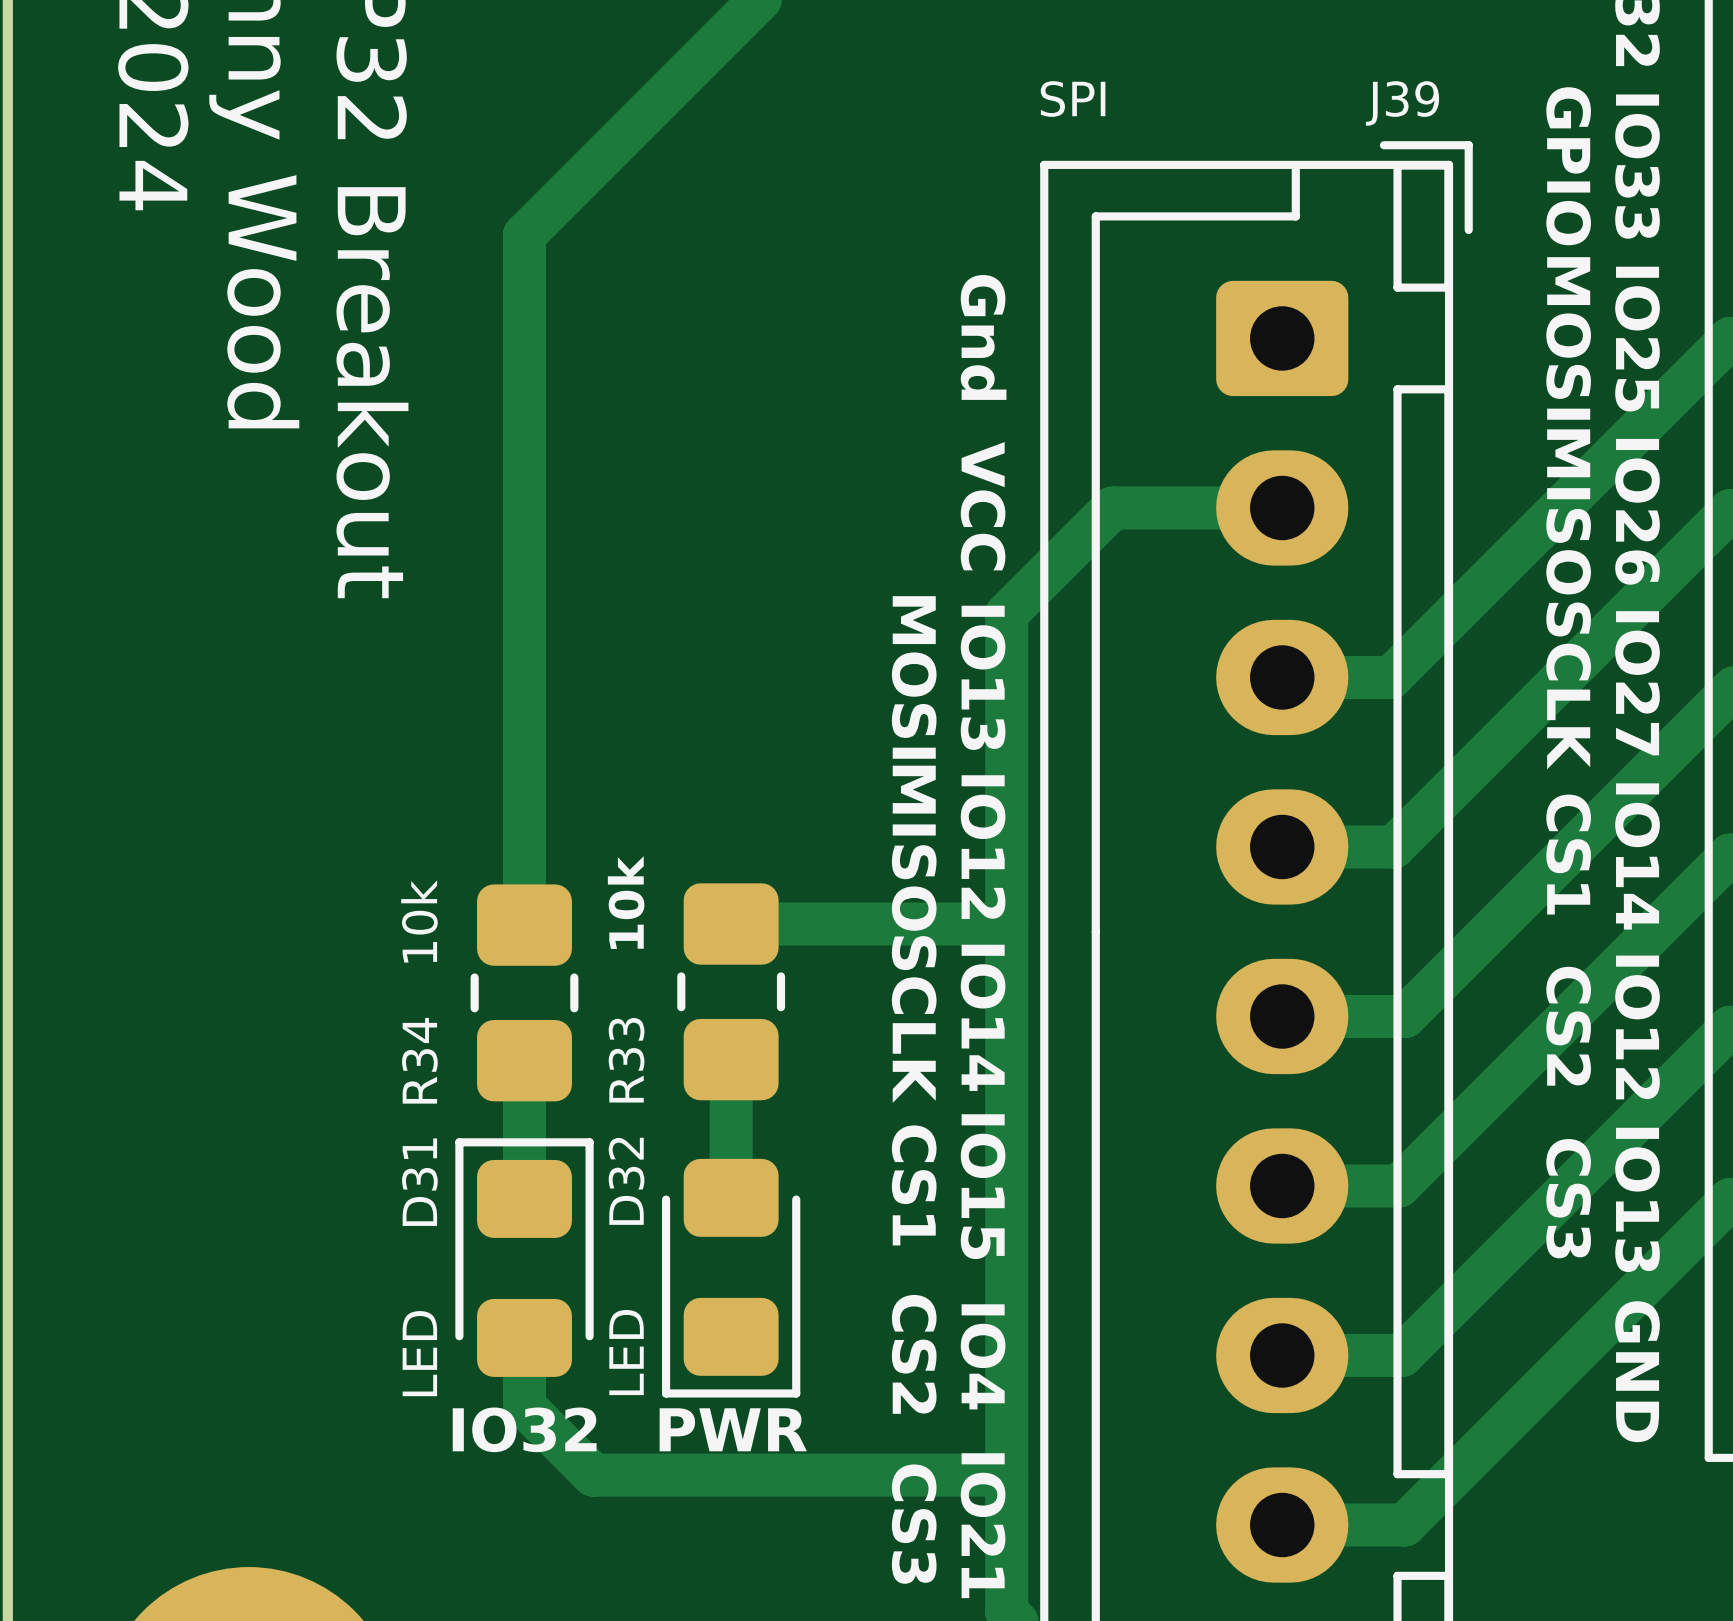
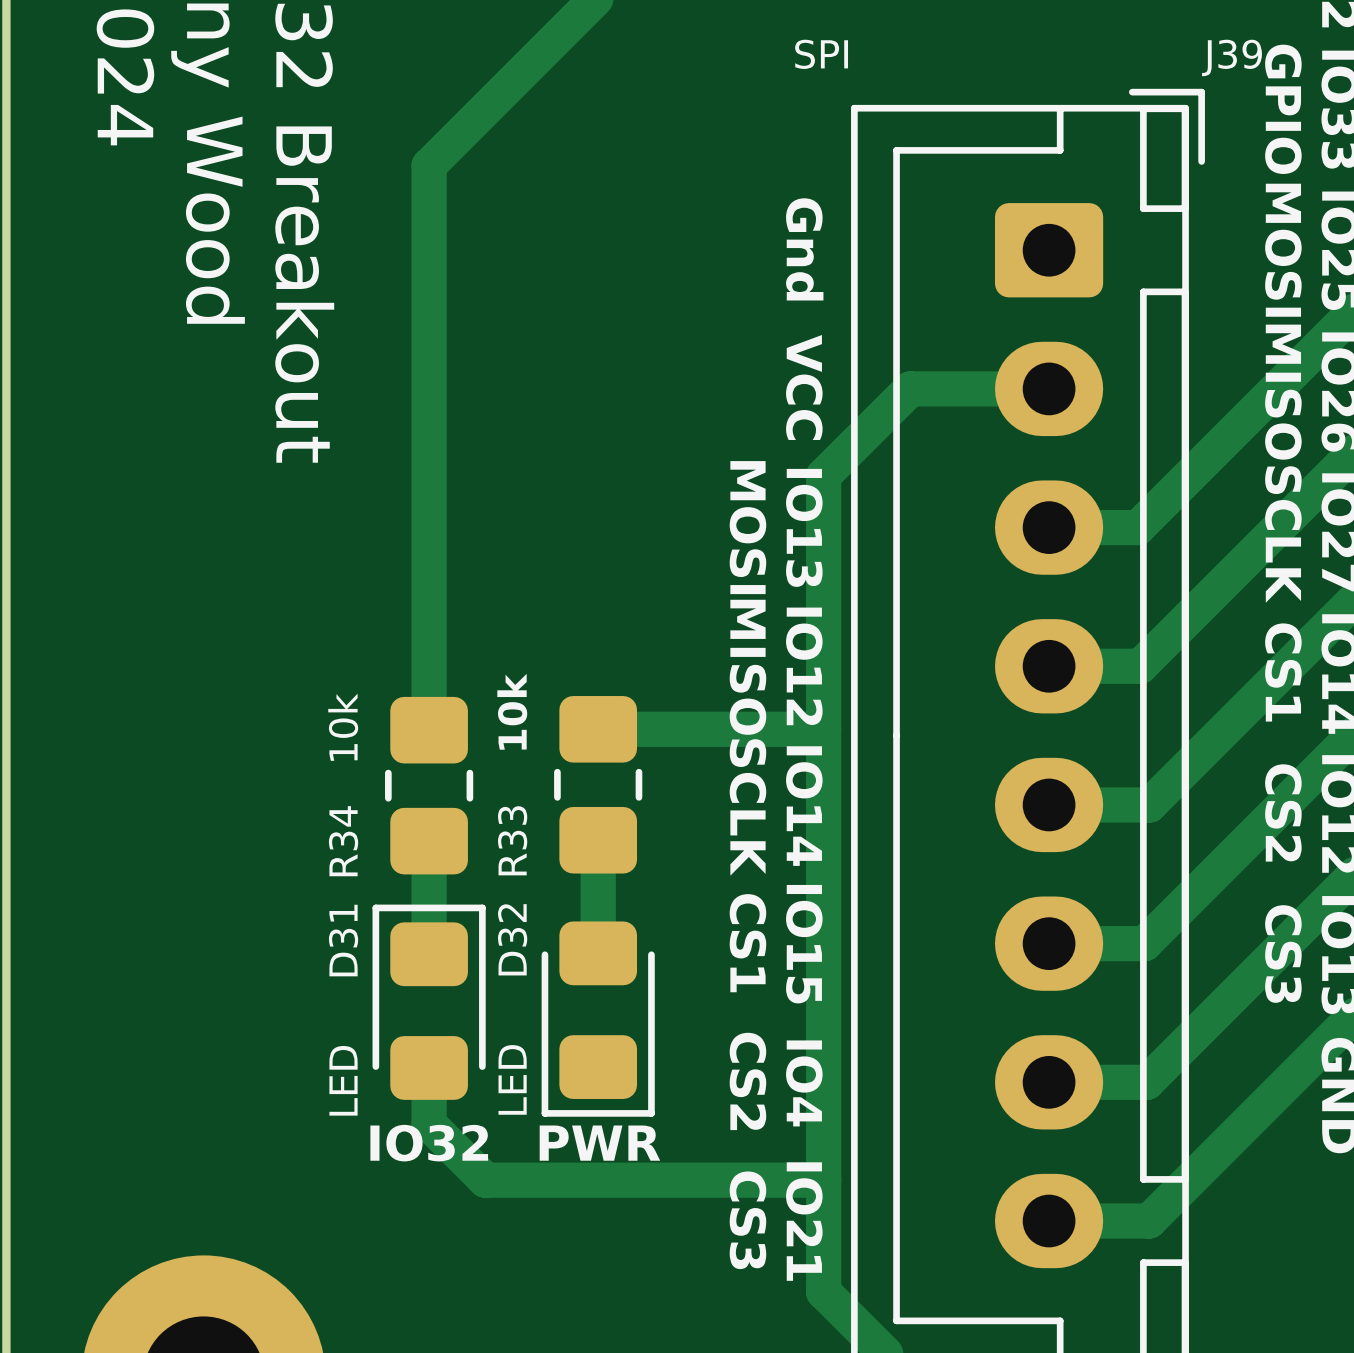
J39 value position: SPI (1073, 99) -> SPI (821, 54)
J39 name position: J39 (1402, 103) -> J39 (1232, 57)

